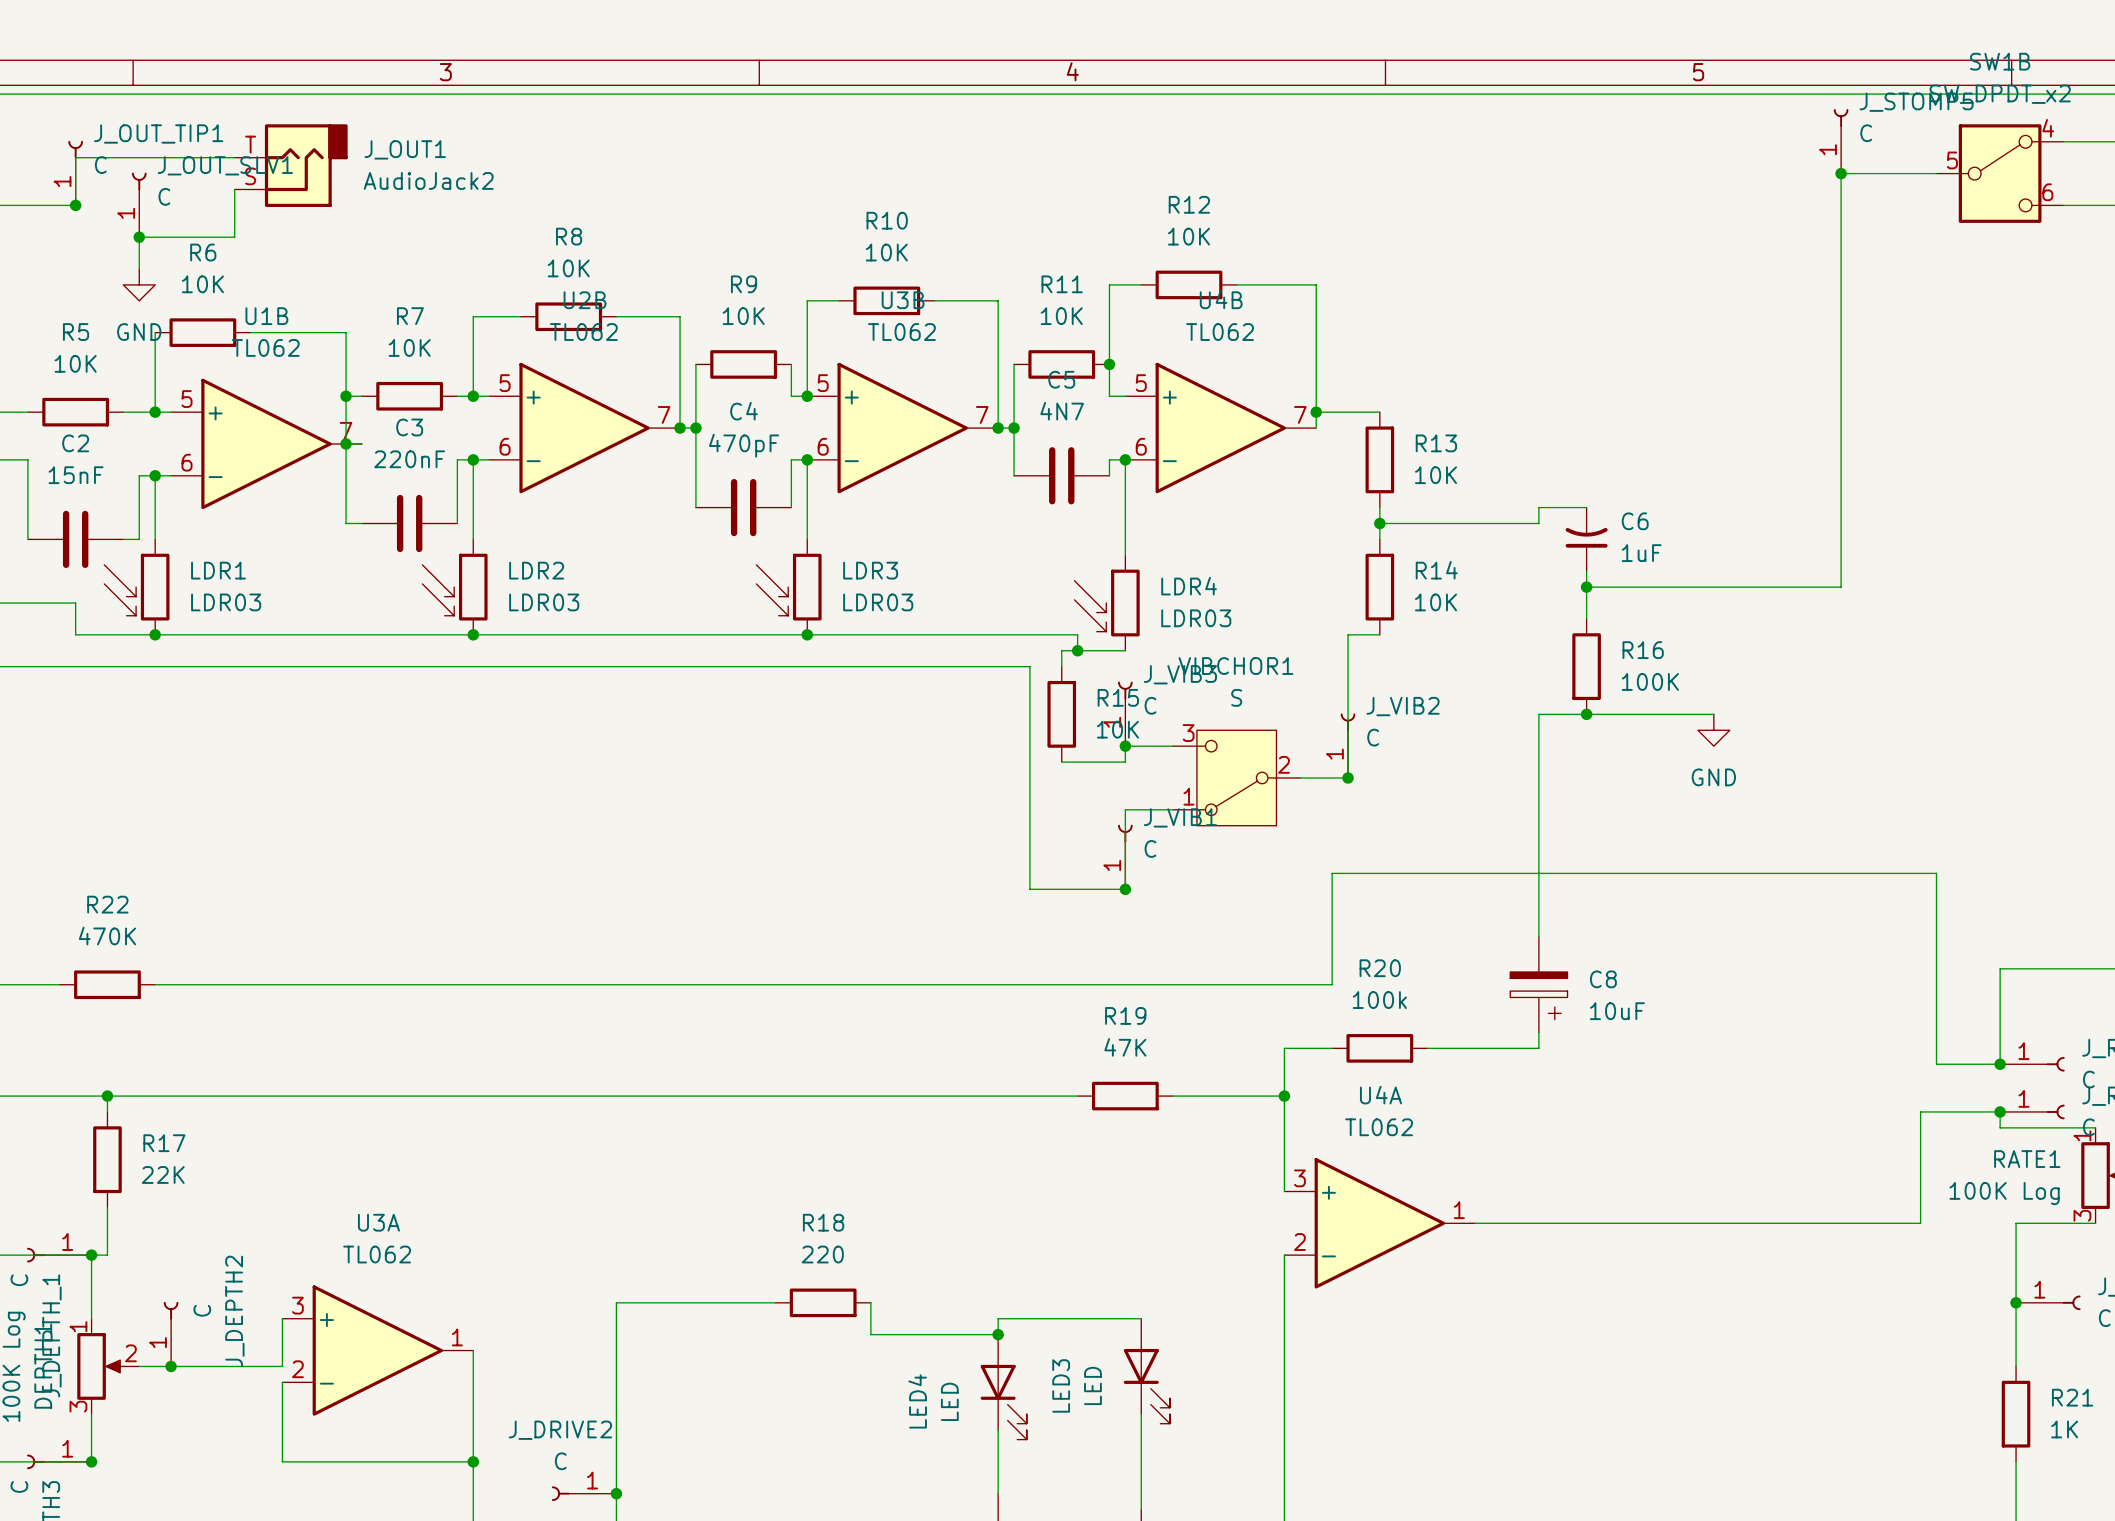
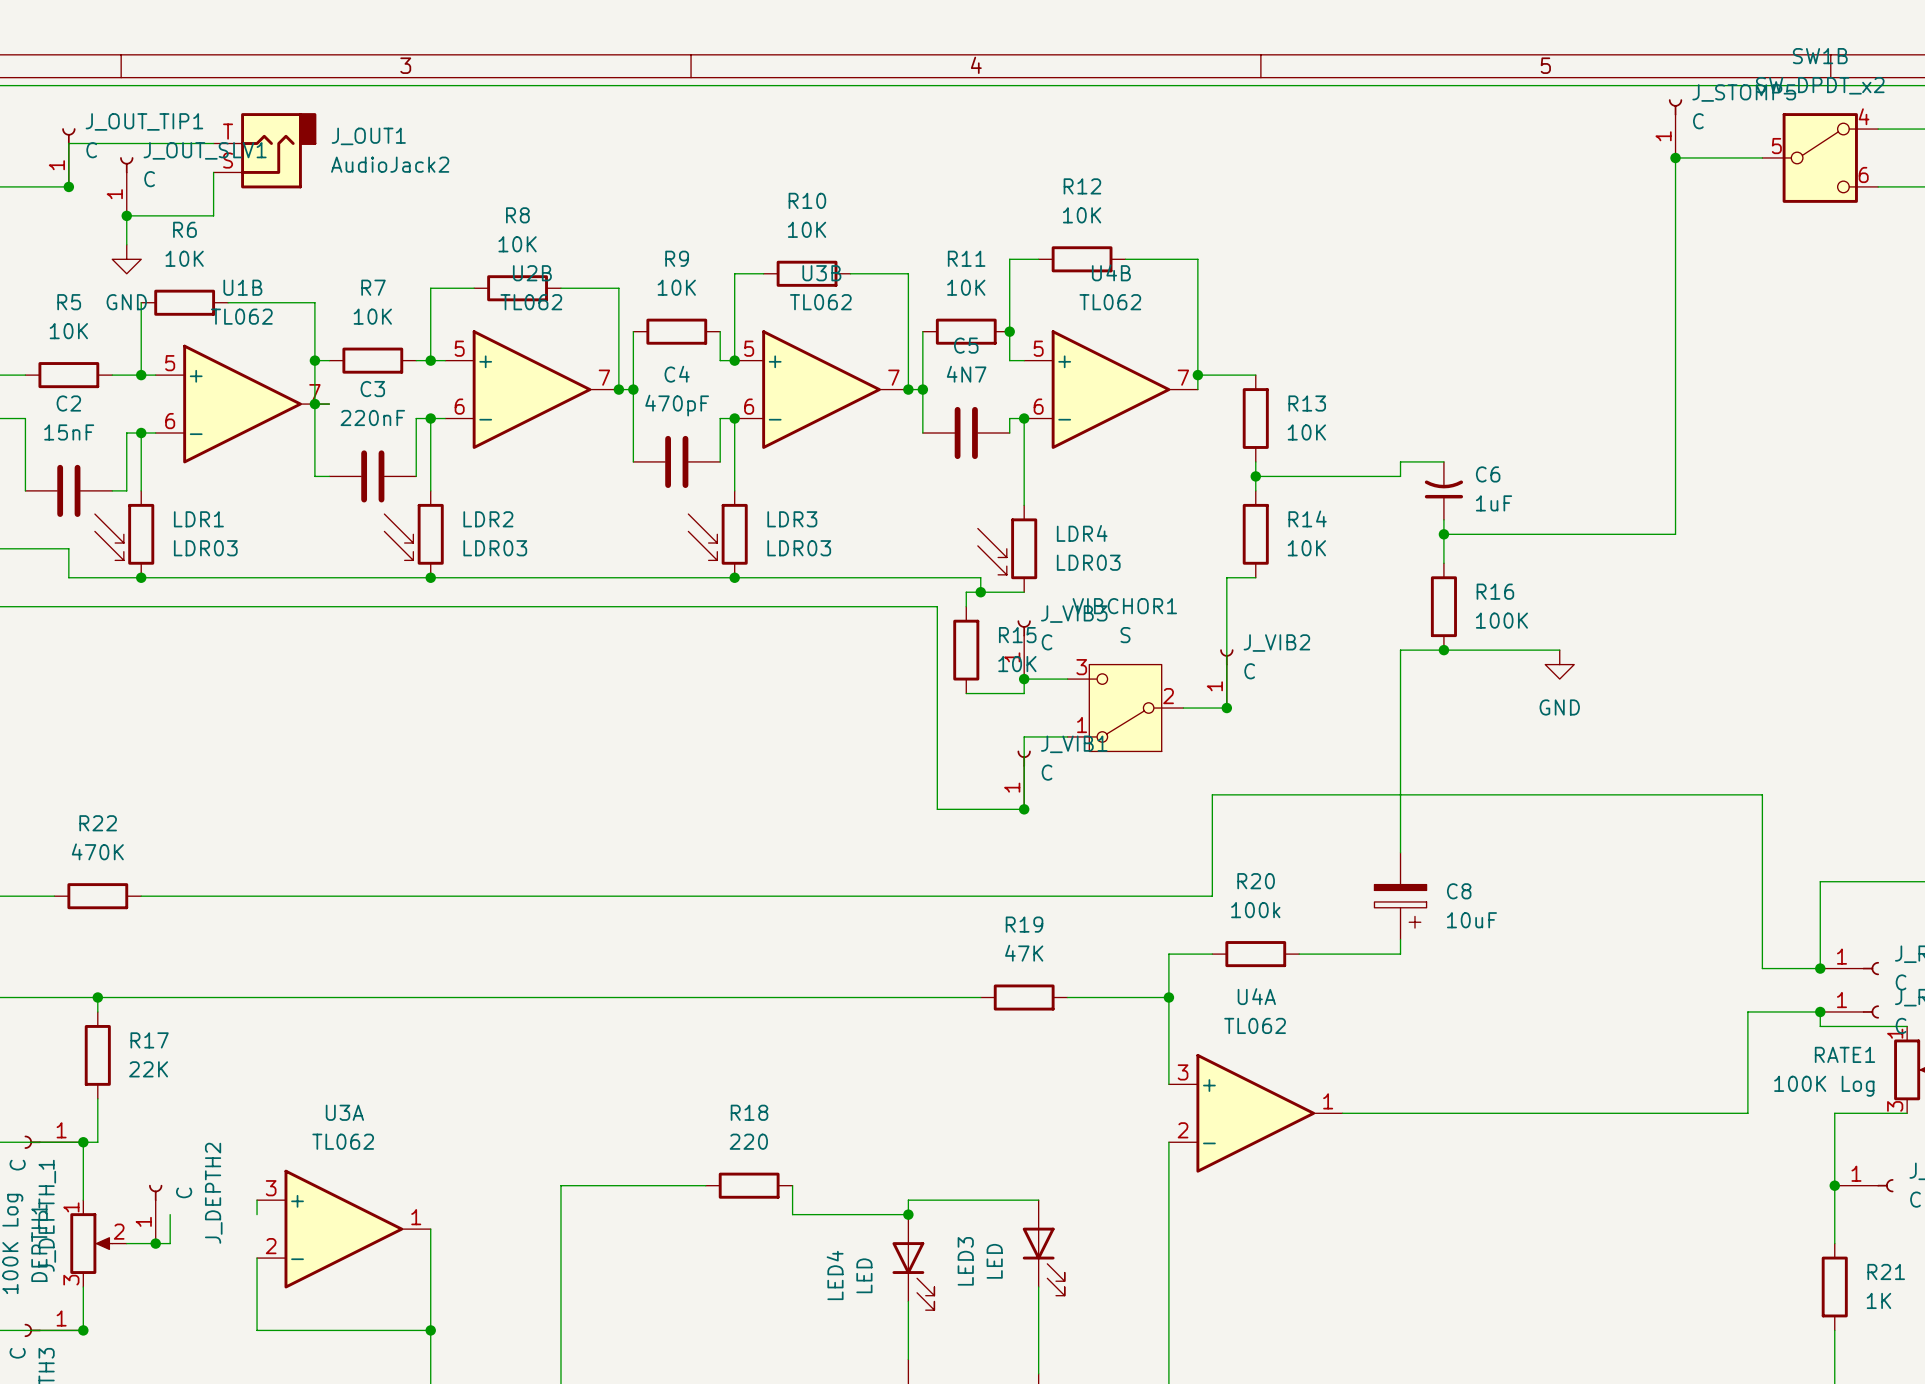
wire: (282, 1334) (282, 1366) (186, 1366) -> (170, 1214) (170, 1243)
J_DRIVE2: C (584, 1493) -> none
junction: (616, 1493) -> none

